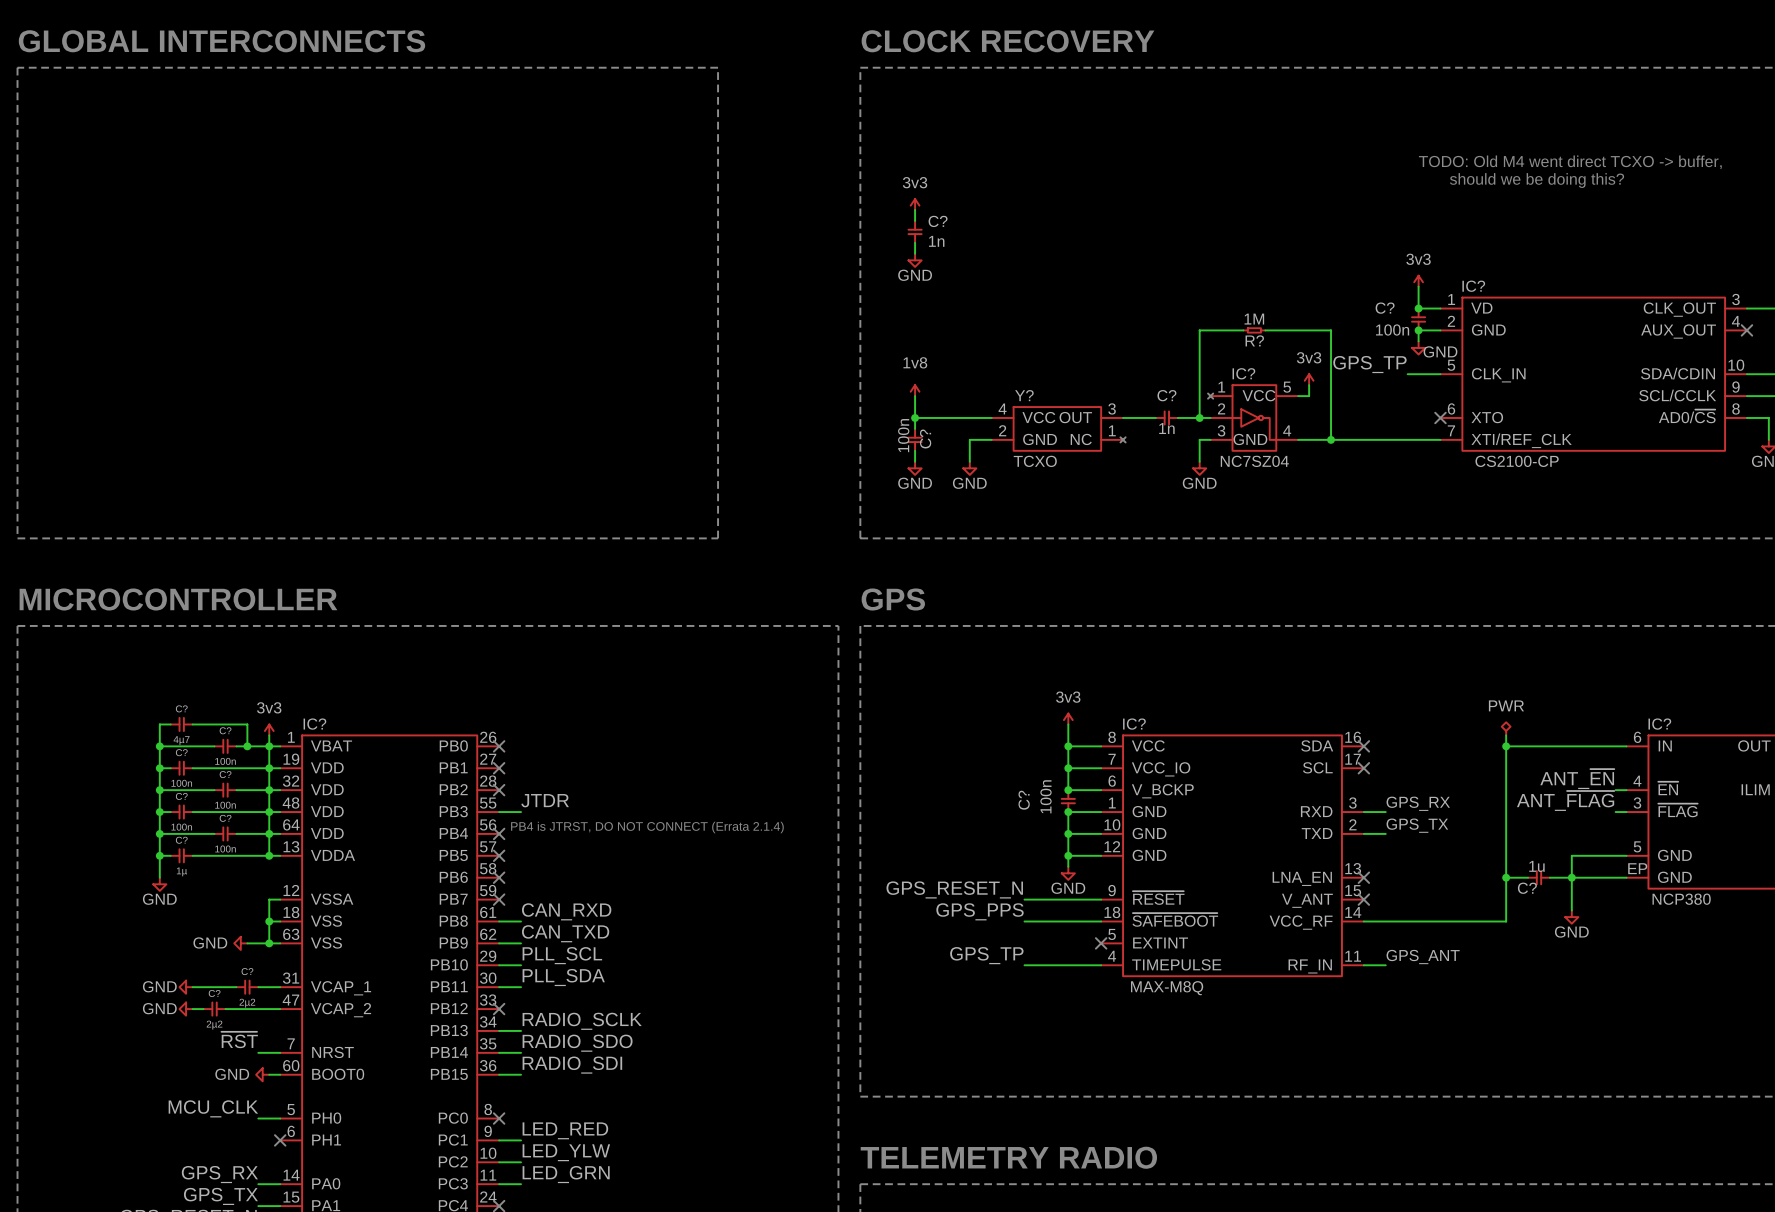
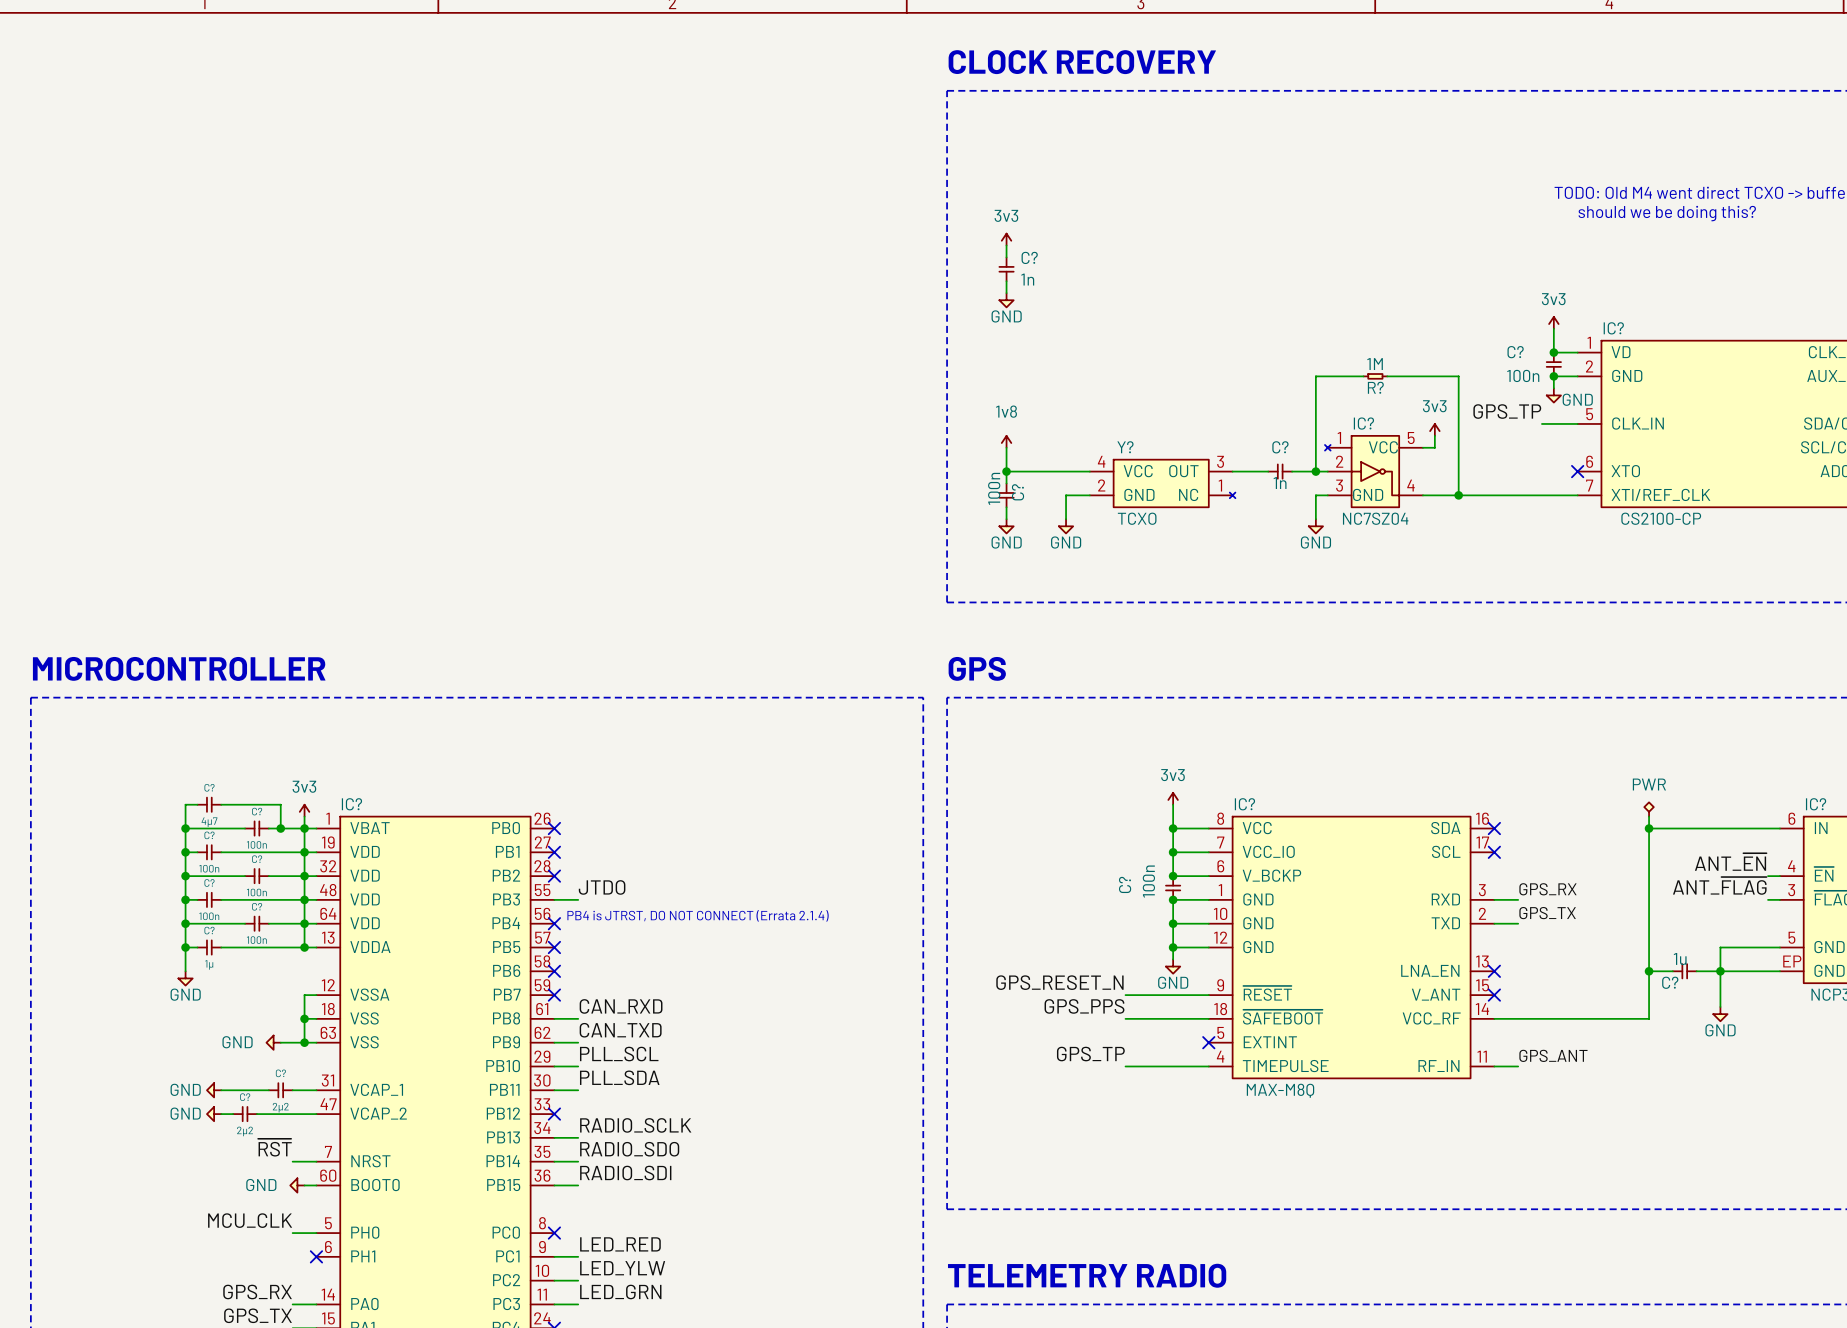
text: GLOBAL INTERCONNECTS (221, 41) -> none
line: (17, 67) (718, 67) (718, 538) (17, 538) (17, 67) -> none
label: JTDR (545, 800) -> JTDO (602, 887)

